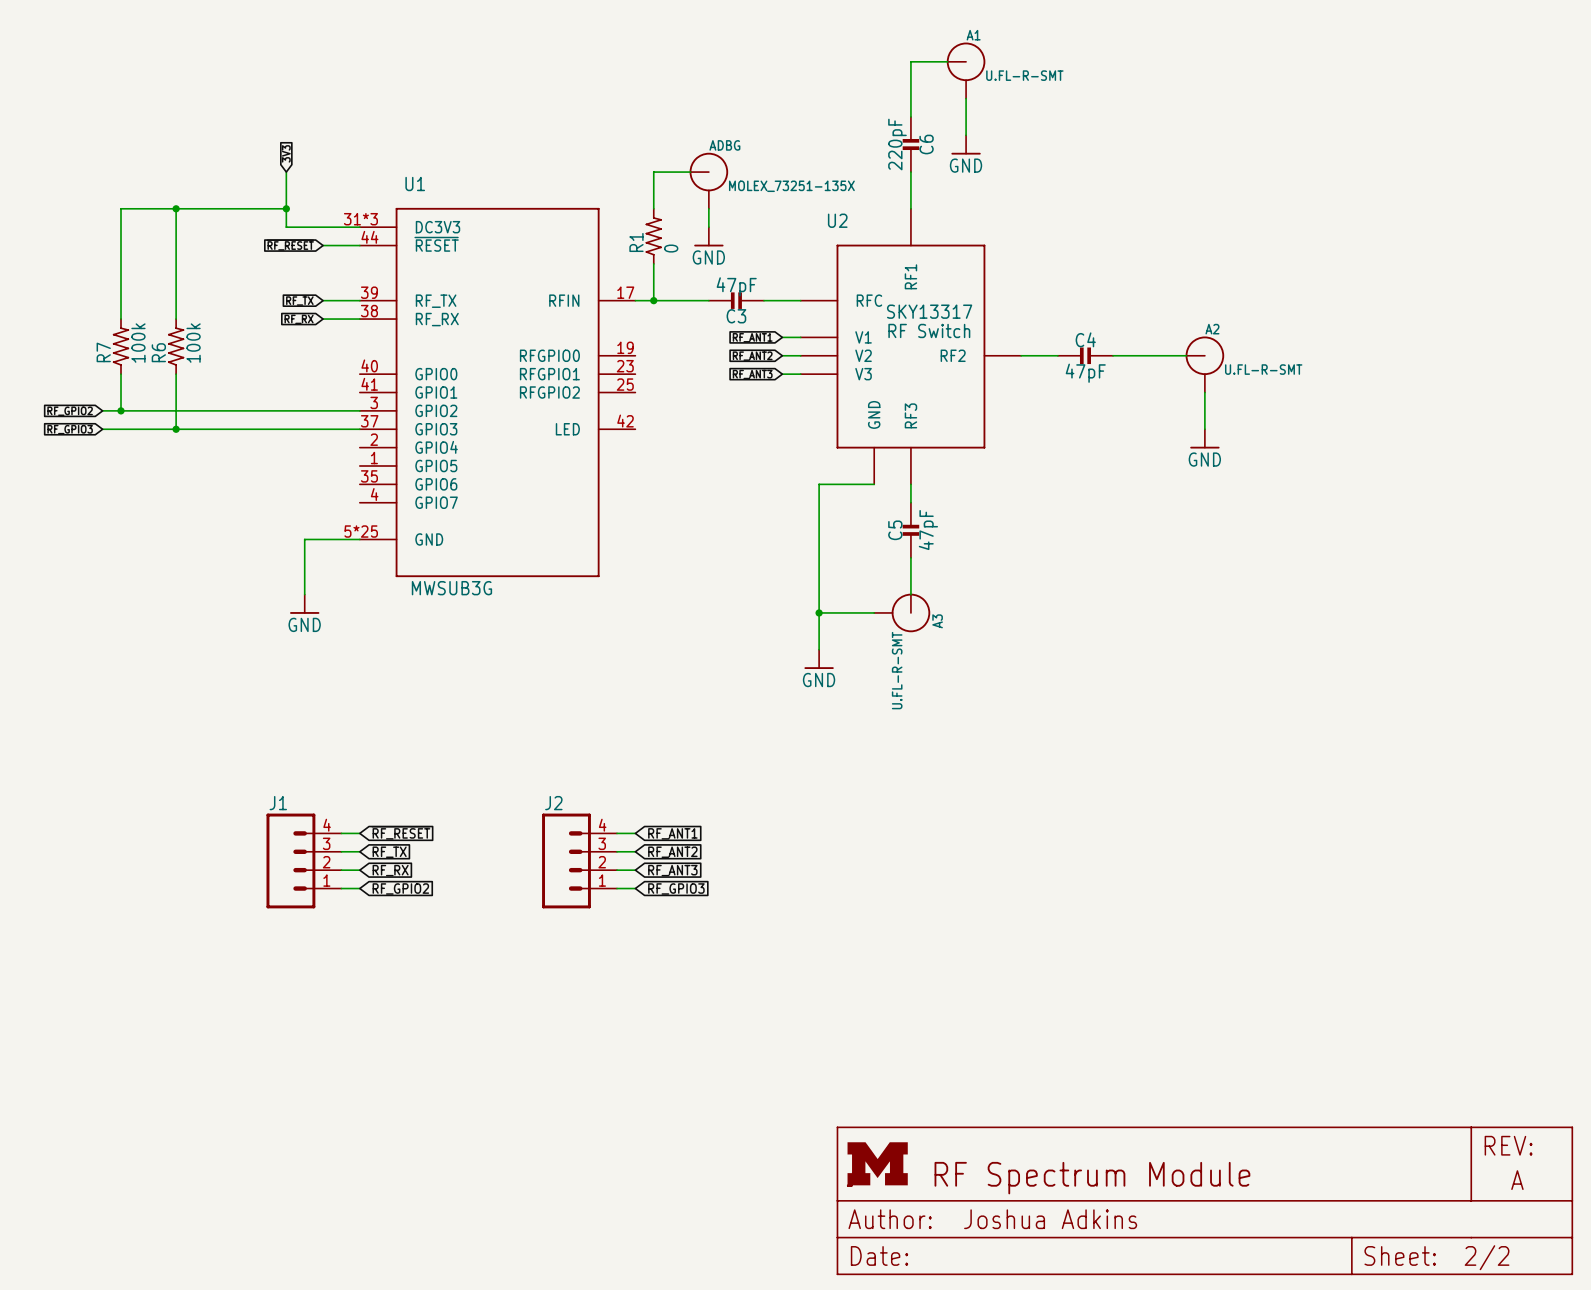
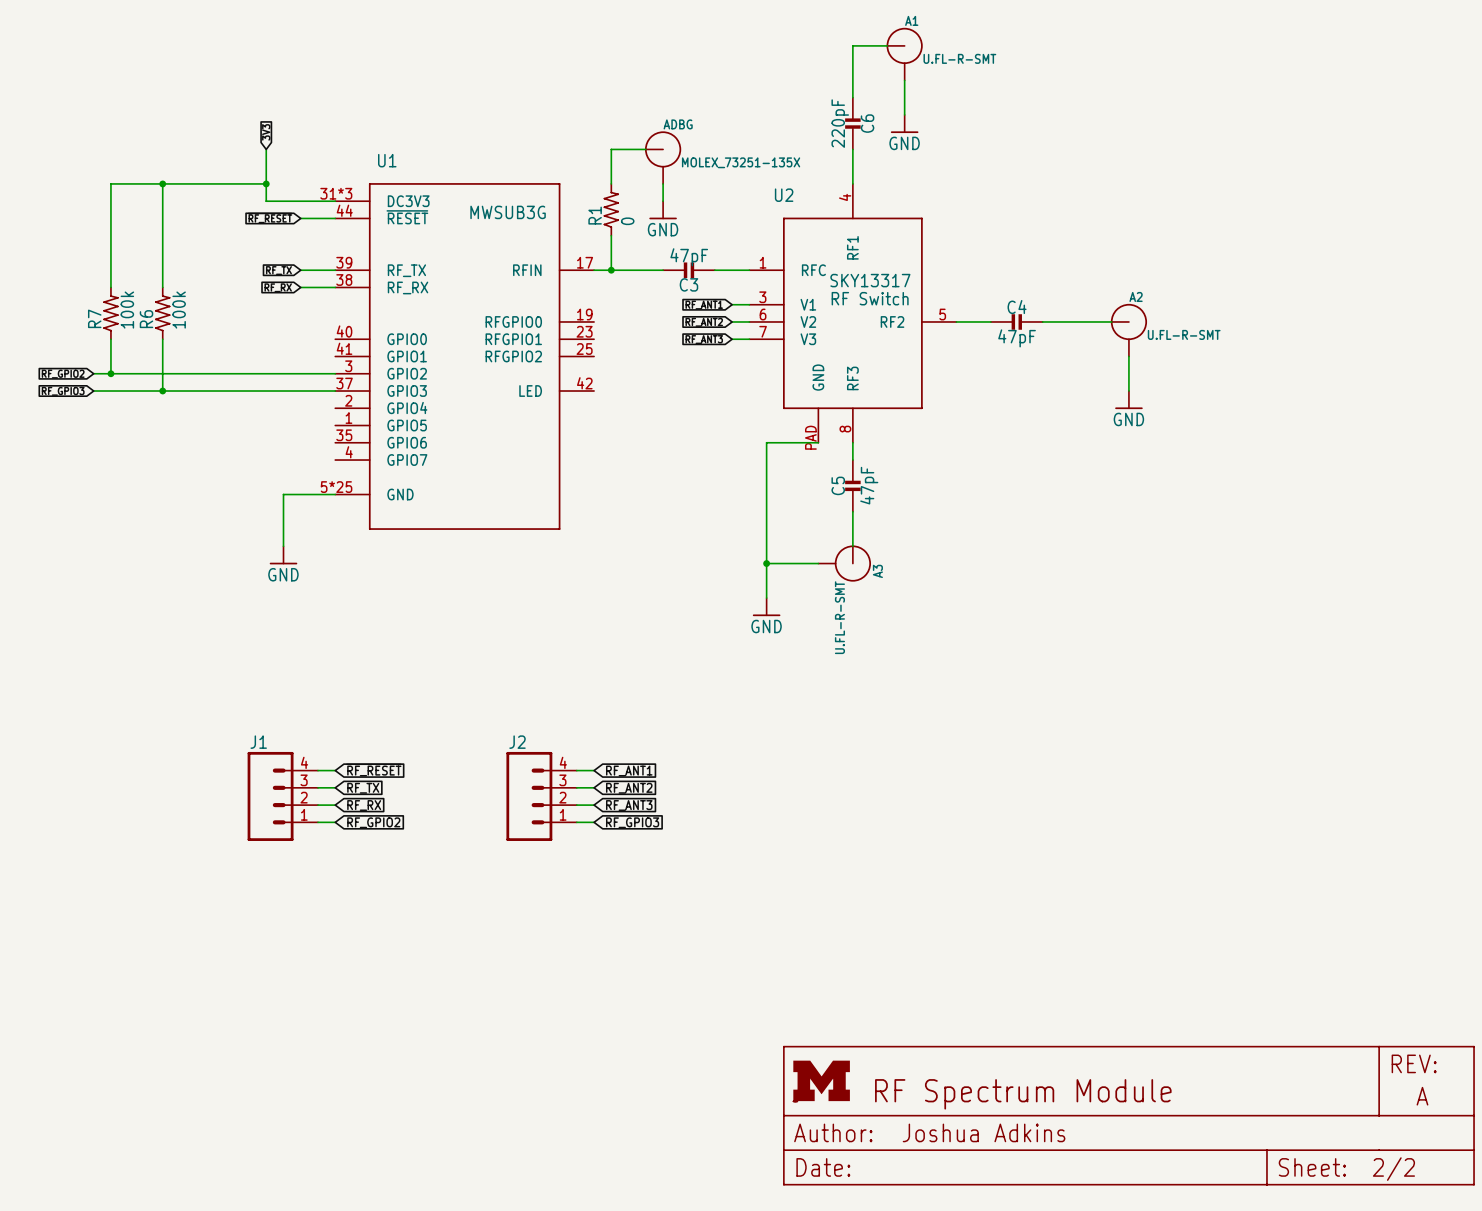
U2 pin number: none -> 4 (845, 197)
U2 pin number: none -> 1 (763, 262)
U2 pin number: none -> 3 (762, 297)
U2 pin number: none -> 6 (763, 314)
U2 pin number: none -> 5 (942, 314)
U2 pin number: none -> 7 (763, 331)
U2 pin number: none -> 8 (845, 429)
U2 pin number: none -> PAD (810, 437)
U1 text position: MWSUB3G (451, 588) -> MWSUB3G (508, 212)

